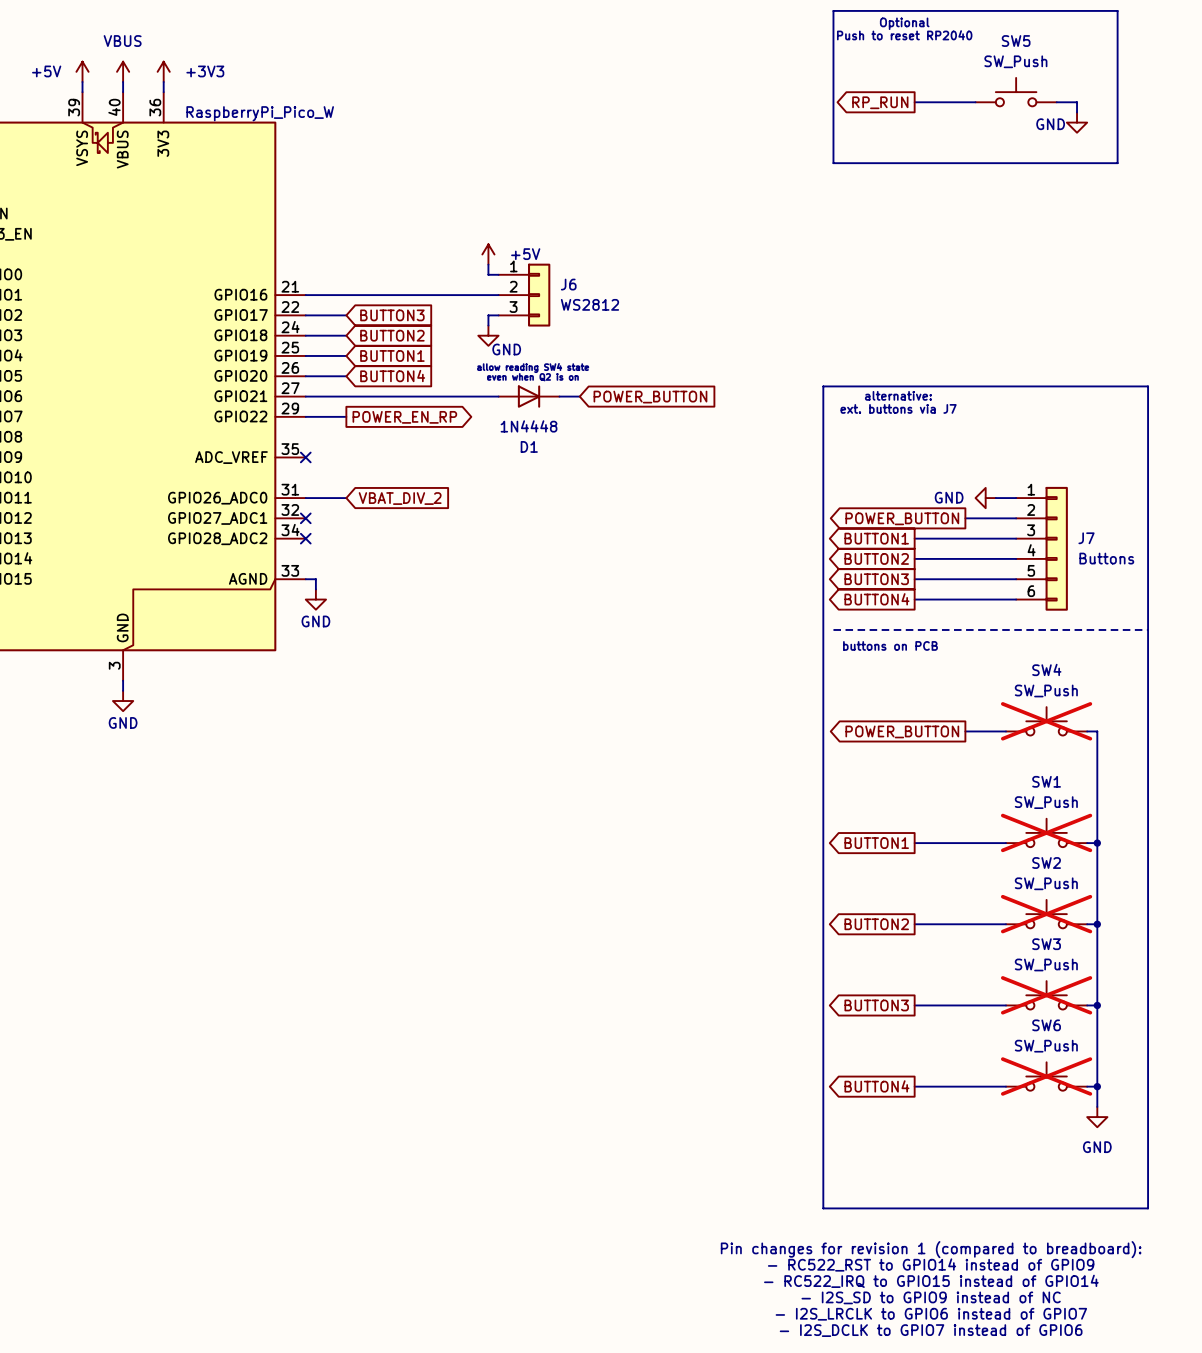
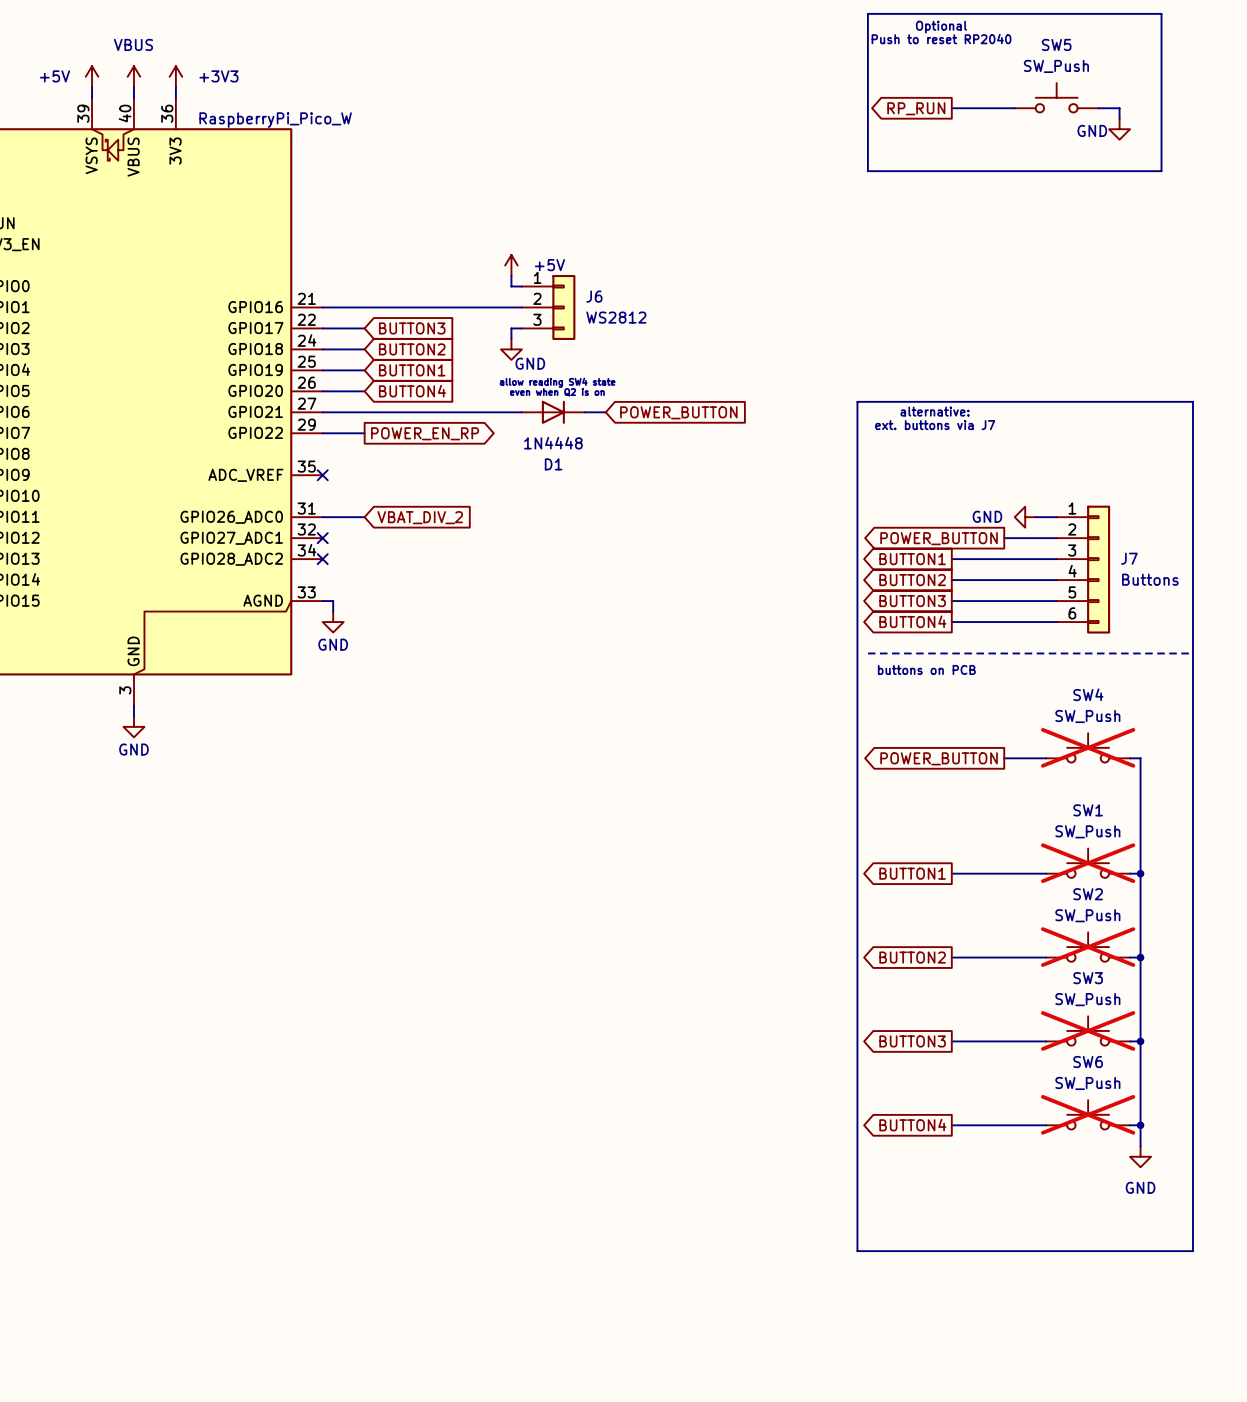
text: Pin changes for revision 1 (compared to breadboard): (931, 1249) -> none
text: - RC522_RST to GPIO14 instead of GPIO9 (931, 1264) -> none
text: - RC522_IRQ to GPIO15 instead of GPIO14 (931, 1281) -> none
text: - I2S_SD to GPIO9 instead of NC (931, 1297) -> none
text: - I2S_LRCLK to GPIO6 instead of GPIO7 (931, 1314) -> none
text: - I2S_DCLK to GPIO7 instead of GPIO6 (931, 1330) -> none

